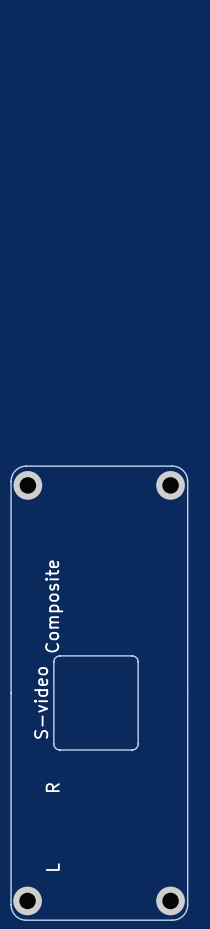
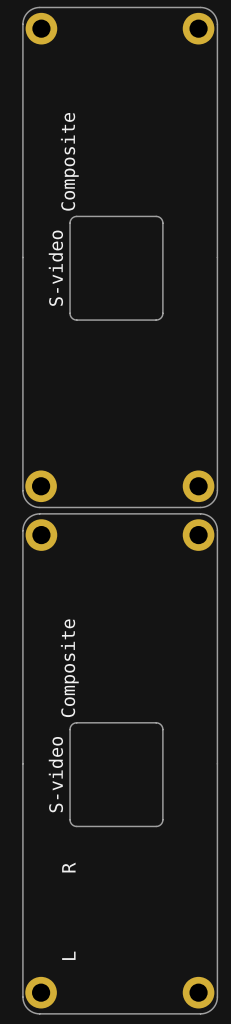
board edge: none -> (200, 7) (37, 7) (29, 11) (23, 18) (22, 490) (26, 501) (34, 506) (202, 507) (211, 503) (216, 496) (217, 24) (212, 12) (200, 7)
part: none -> (41, 28)
part: none -> (198, 28)
text: none -> Composite (69, 161)
board edge: none -> (156, 216) (76, 216) (71, 218) (70, 313) (72, 318) (156, 320) (161, 317) (162, 223) (160, 218) (156, 216)
text: none -> S-video (55, 268)
part: none -> (41, 486)
part: none -> (198, 486)

